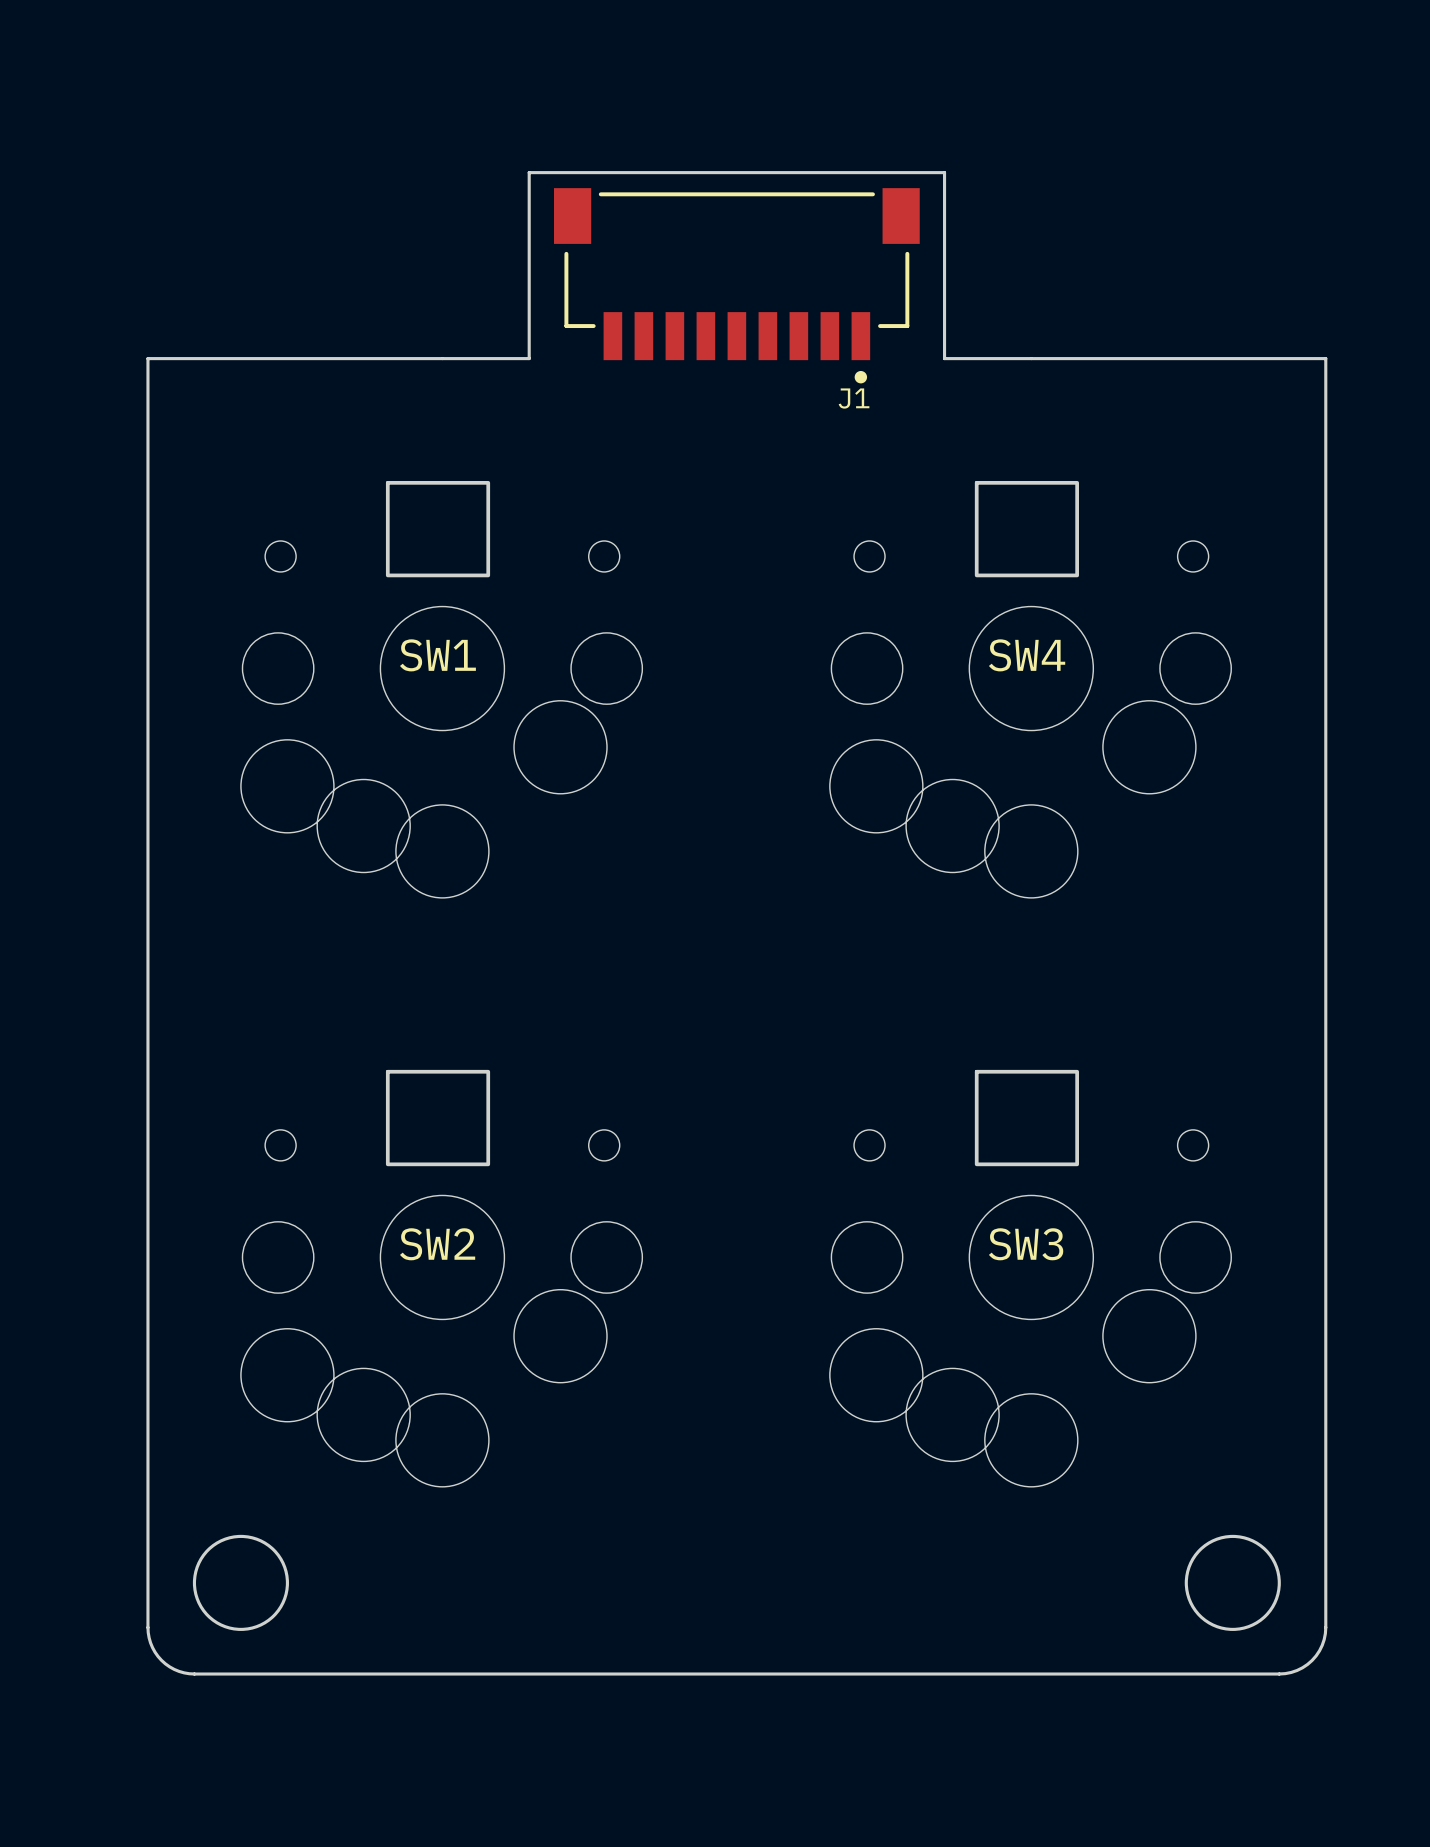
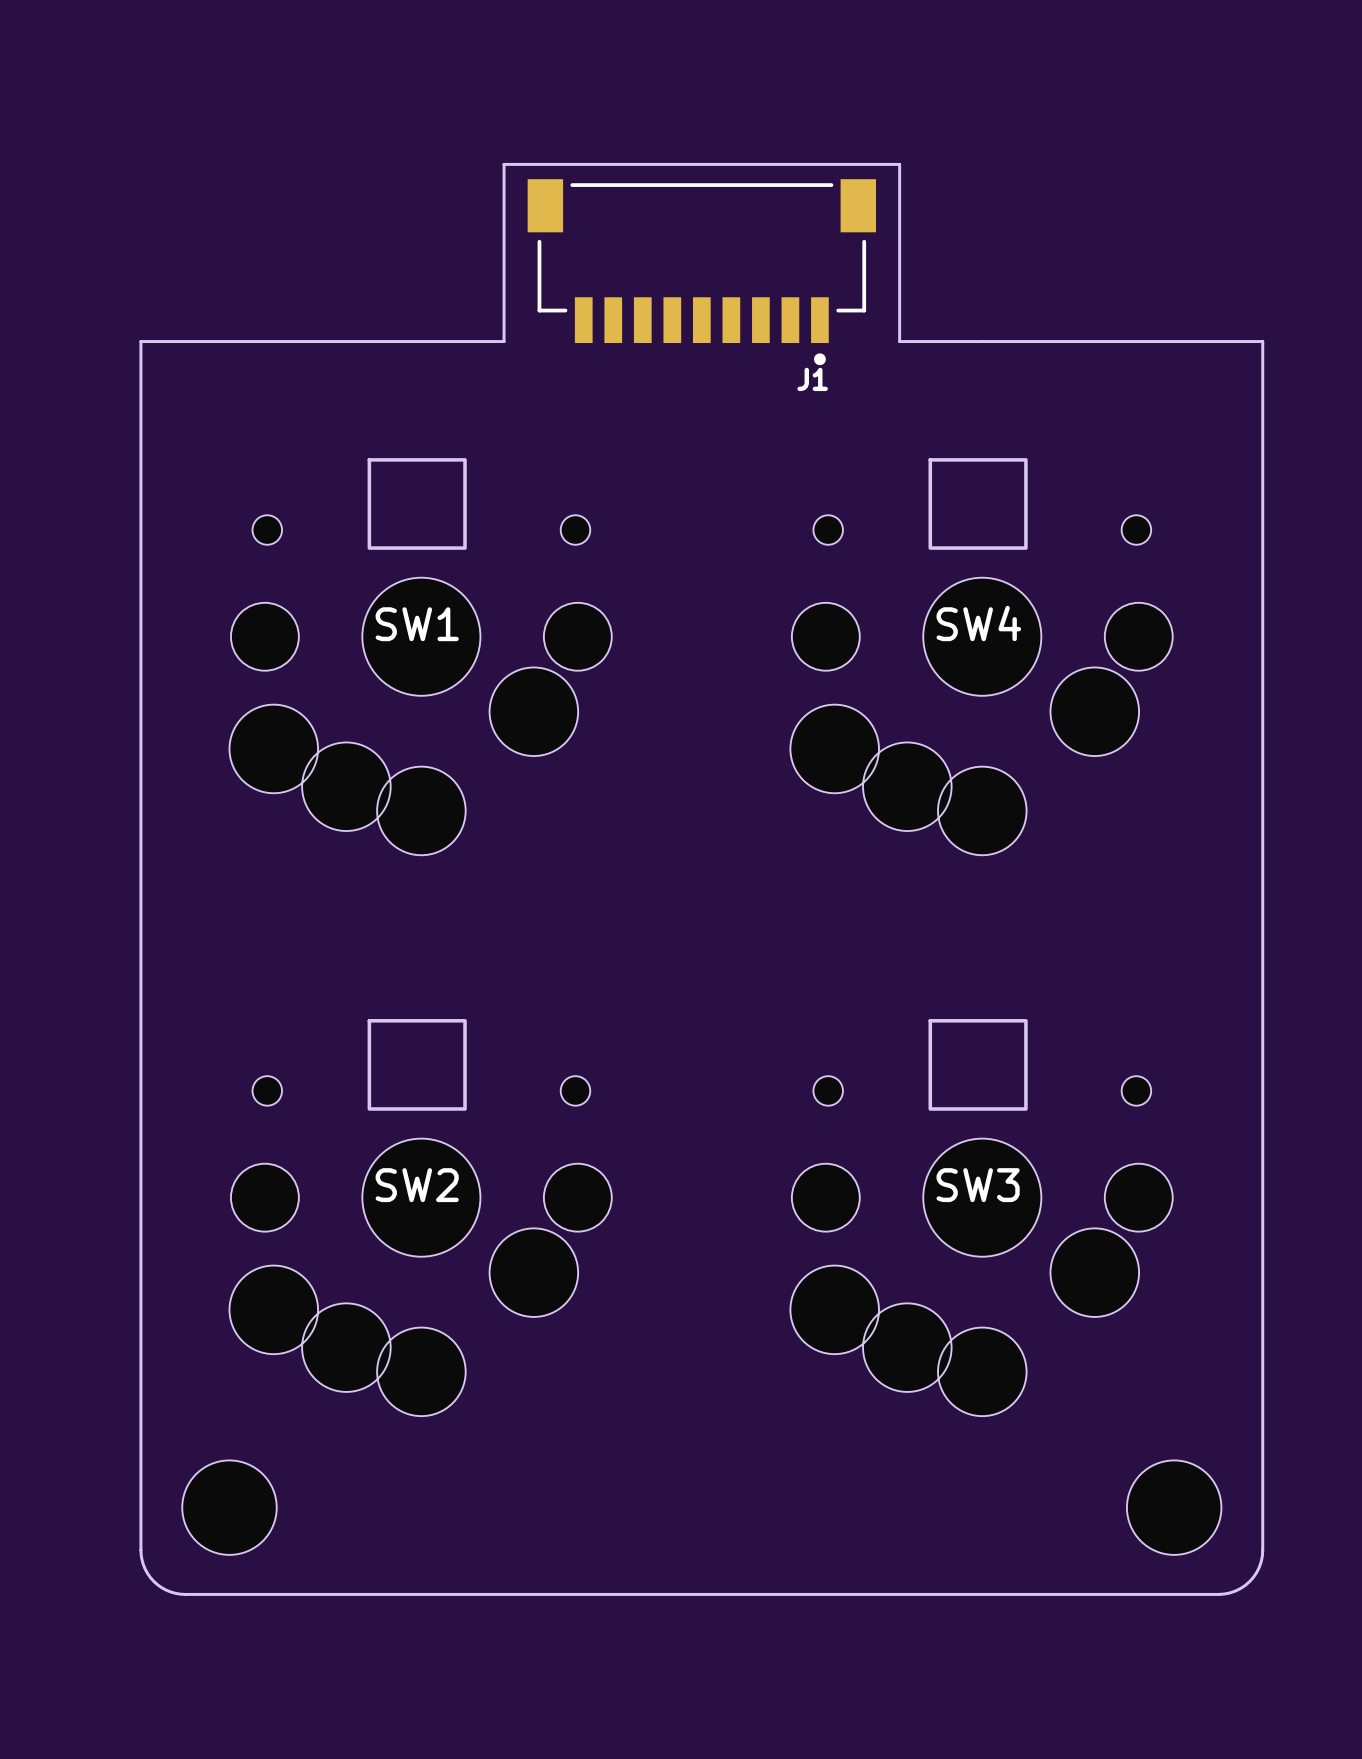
round board edge: [192, 1534, 289, 1631] -> none
round board edge: [1184, 1534, 1281, 1631] -> none
part: none -> (229, 1507)
part: none -> (1174, 1507)

